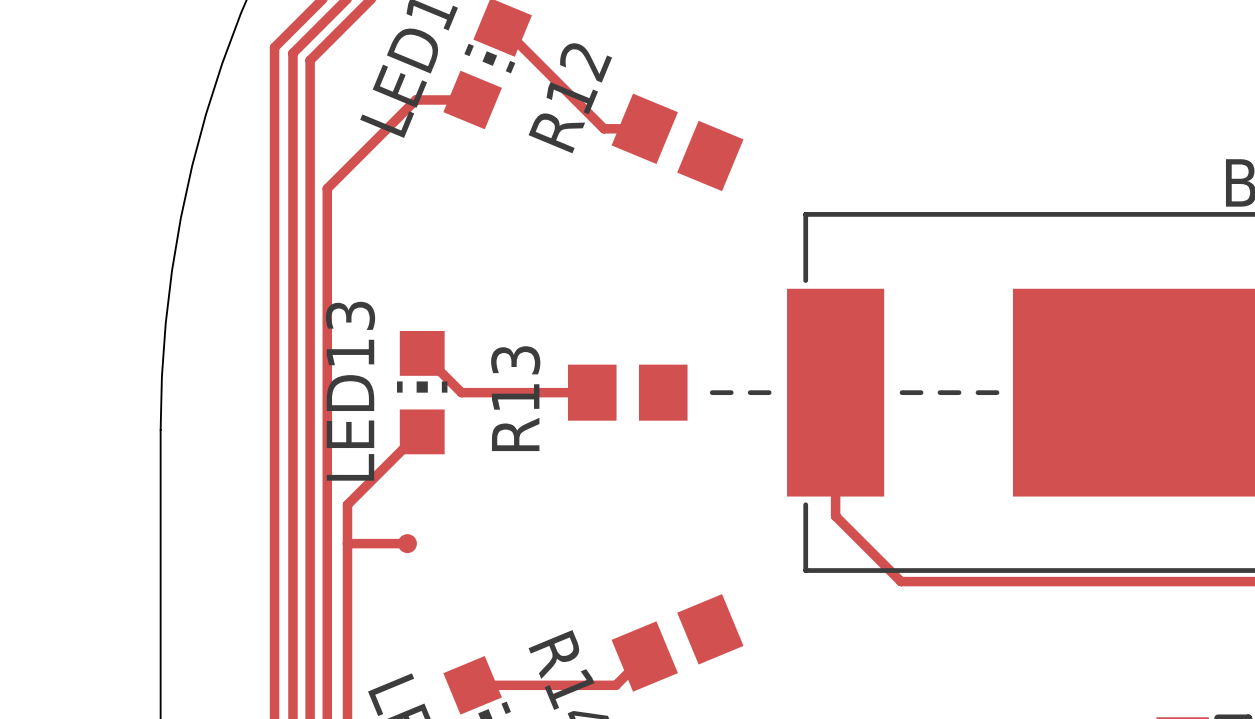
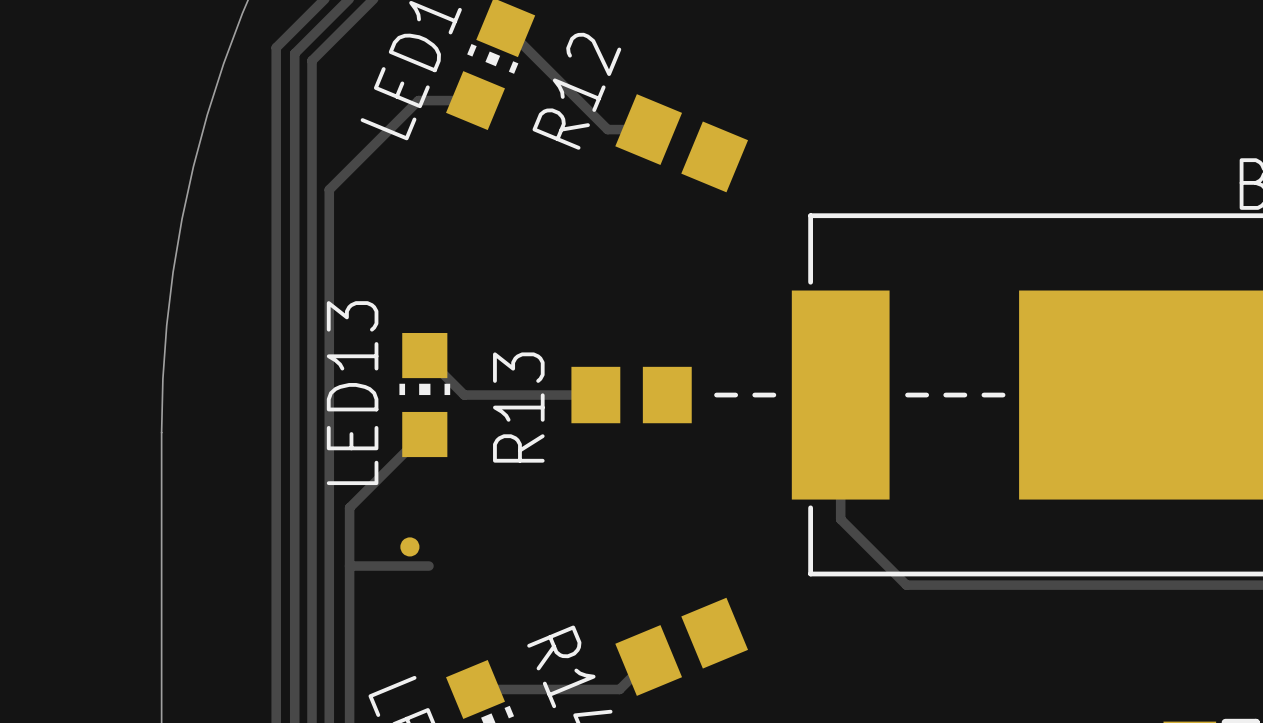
track: (347, 543) (407, 543) -> none
track: none -> (349, 566) (429, 566)

